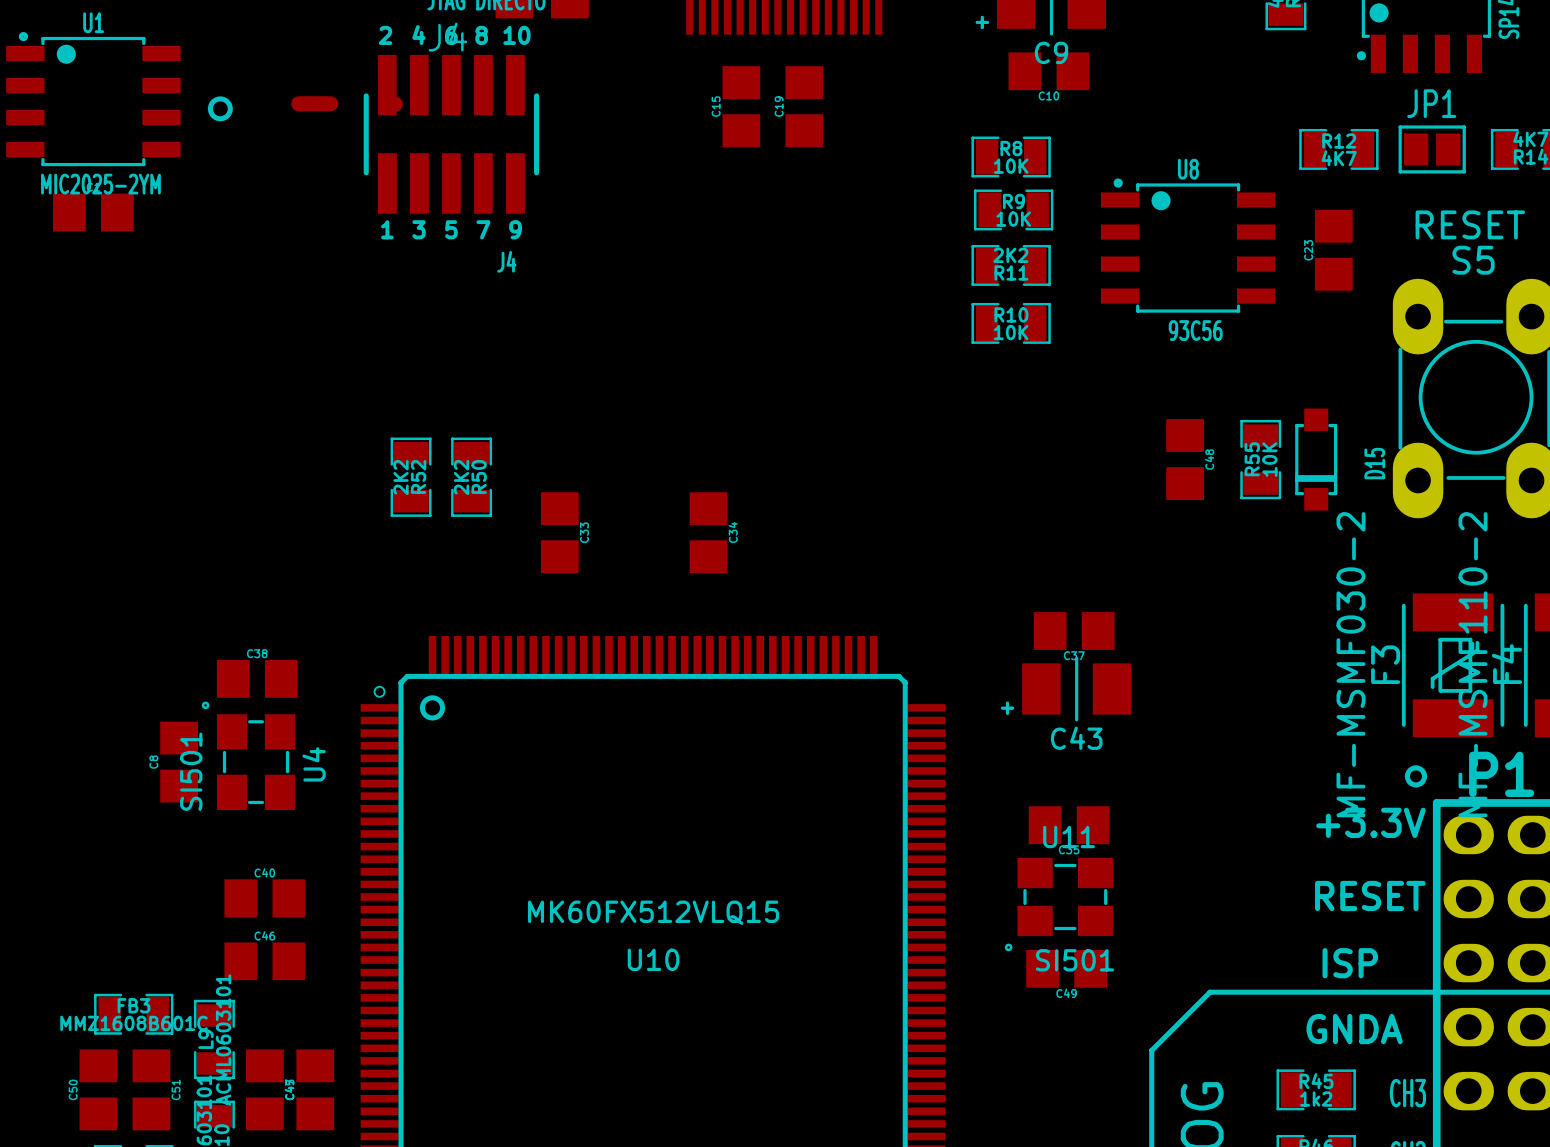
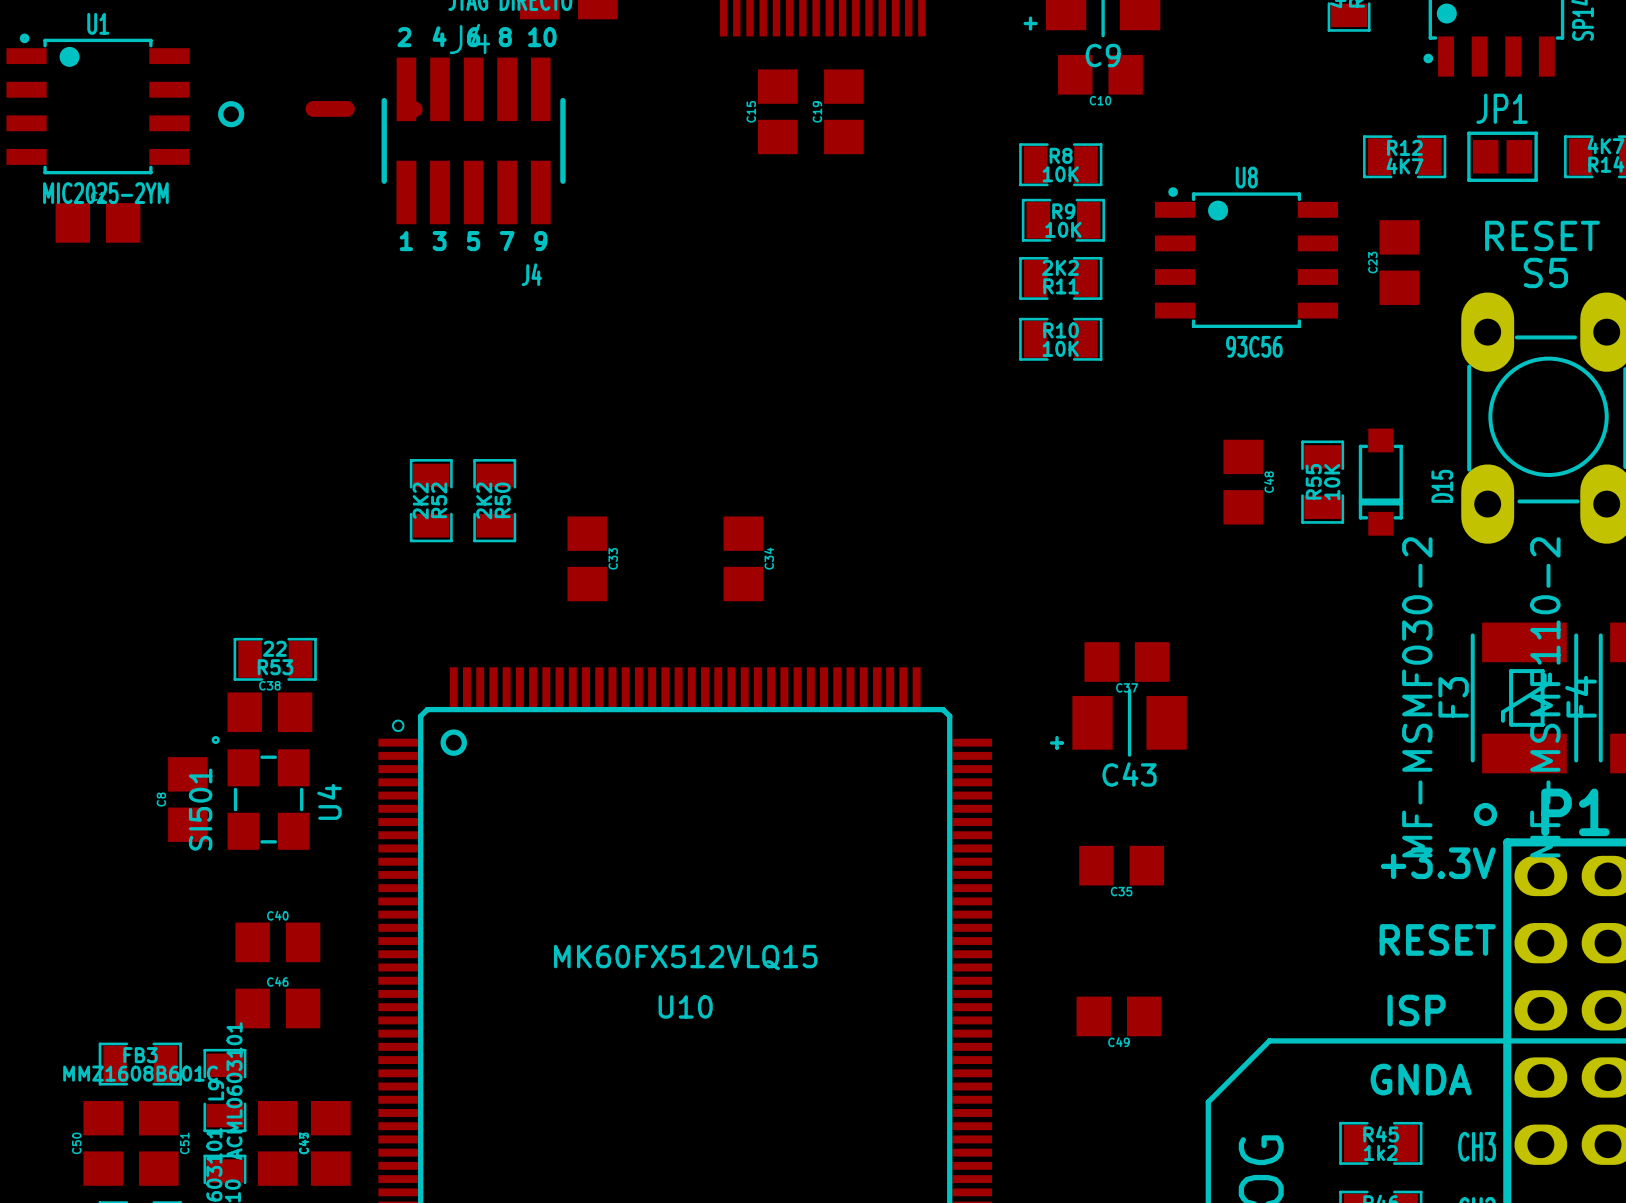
R53: none -> 22 (275, 659)
U11: SI501 (1059, 904) -> none

